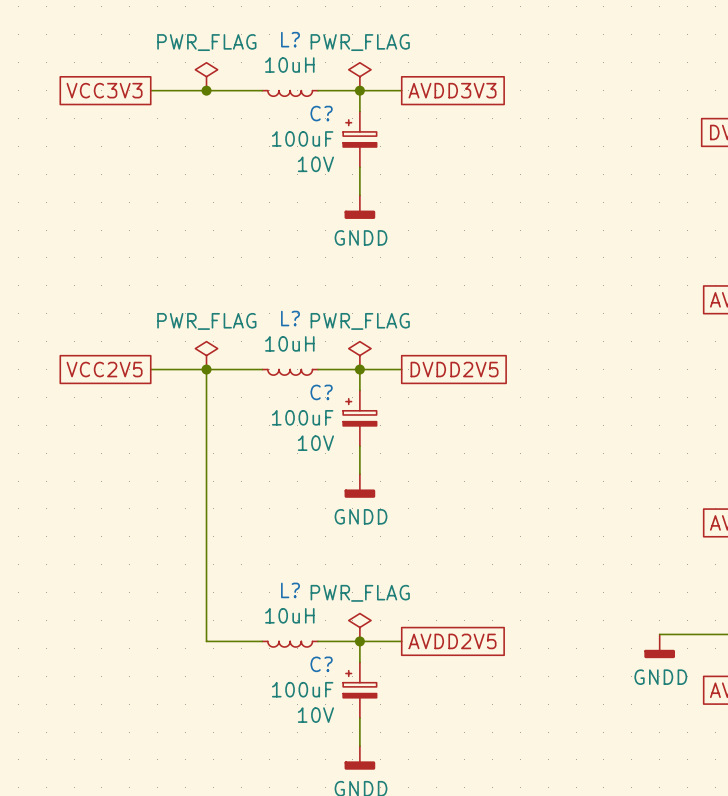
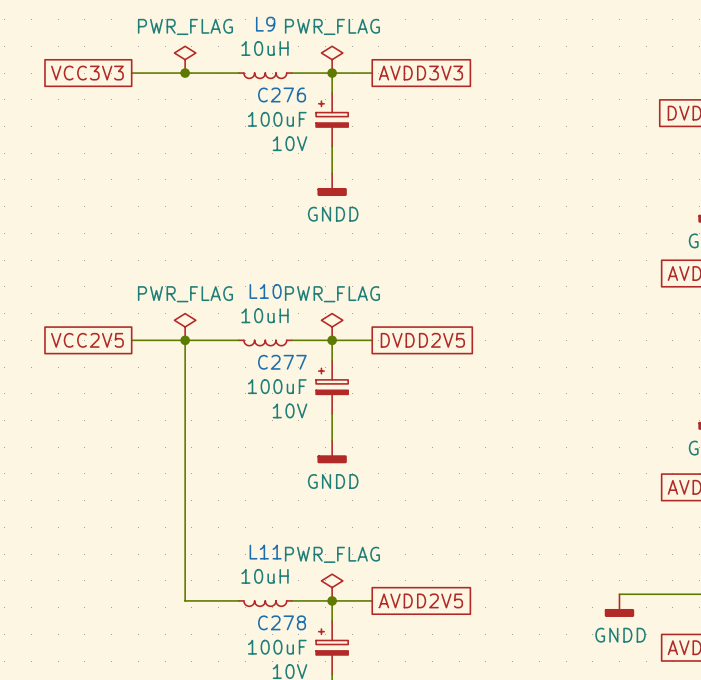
L? name: L? (290, 39) -> L9 (265, 24)
C? name: C? (321, 113) -> C276 (282, 95)
L? name: L? (290, 318) -> L10 (265, 291)
C? name: C? (321, 392) -> C277 (282, 362)
L? name: L? (290, 590) -> L11 (265, 552)
C? name: C? (321, 664) -> C278 (282, 622)

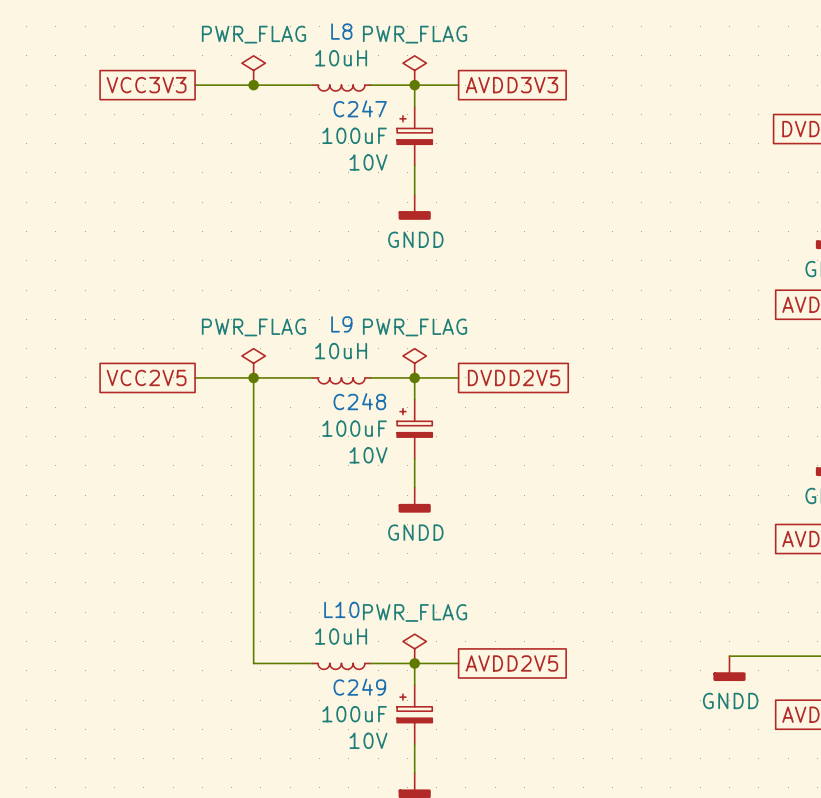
L9 name: L9 (265, 24) -> L8 (341, 31)
C276 name: C276 (282, 95) -> C247 (360, 108)
L10 name: L10 (265, 291) -> L9 (341, 324)
C277 name: C277 (282, 362) -> C248 (359, 401)
L11 name: L11 (265, 552) -> L10 (341, 609)
C278 name: C278 (282, 622) -> C249 (359, 687)

